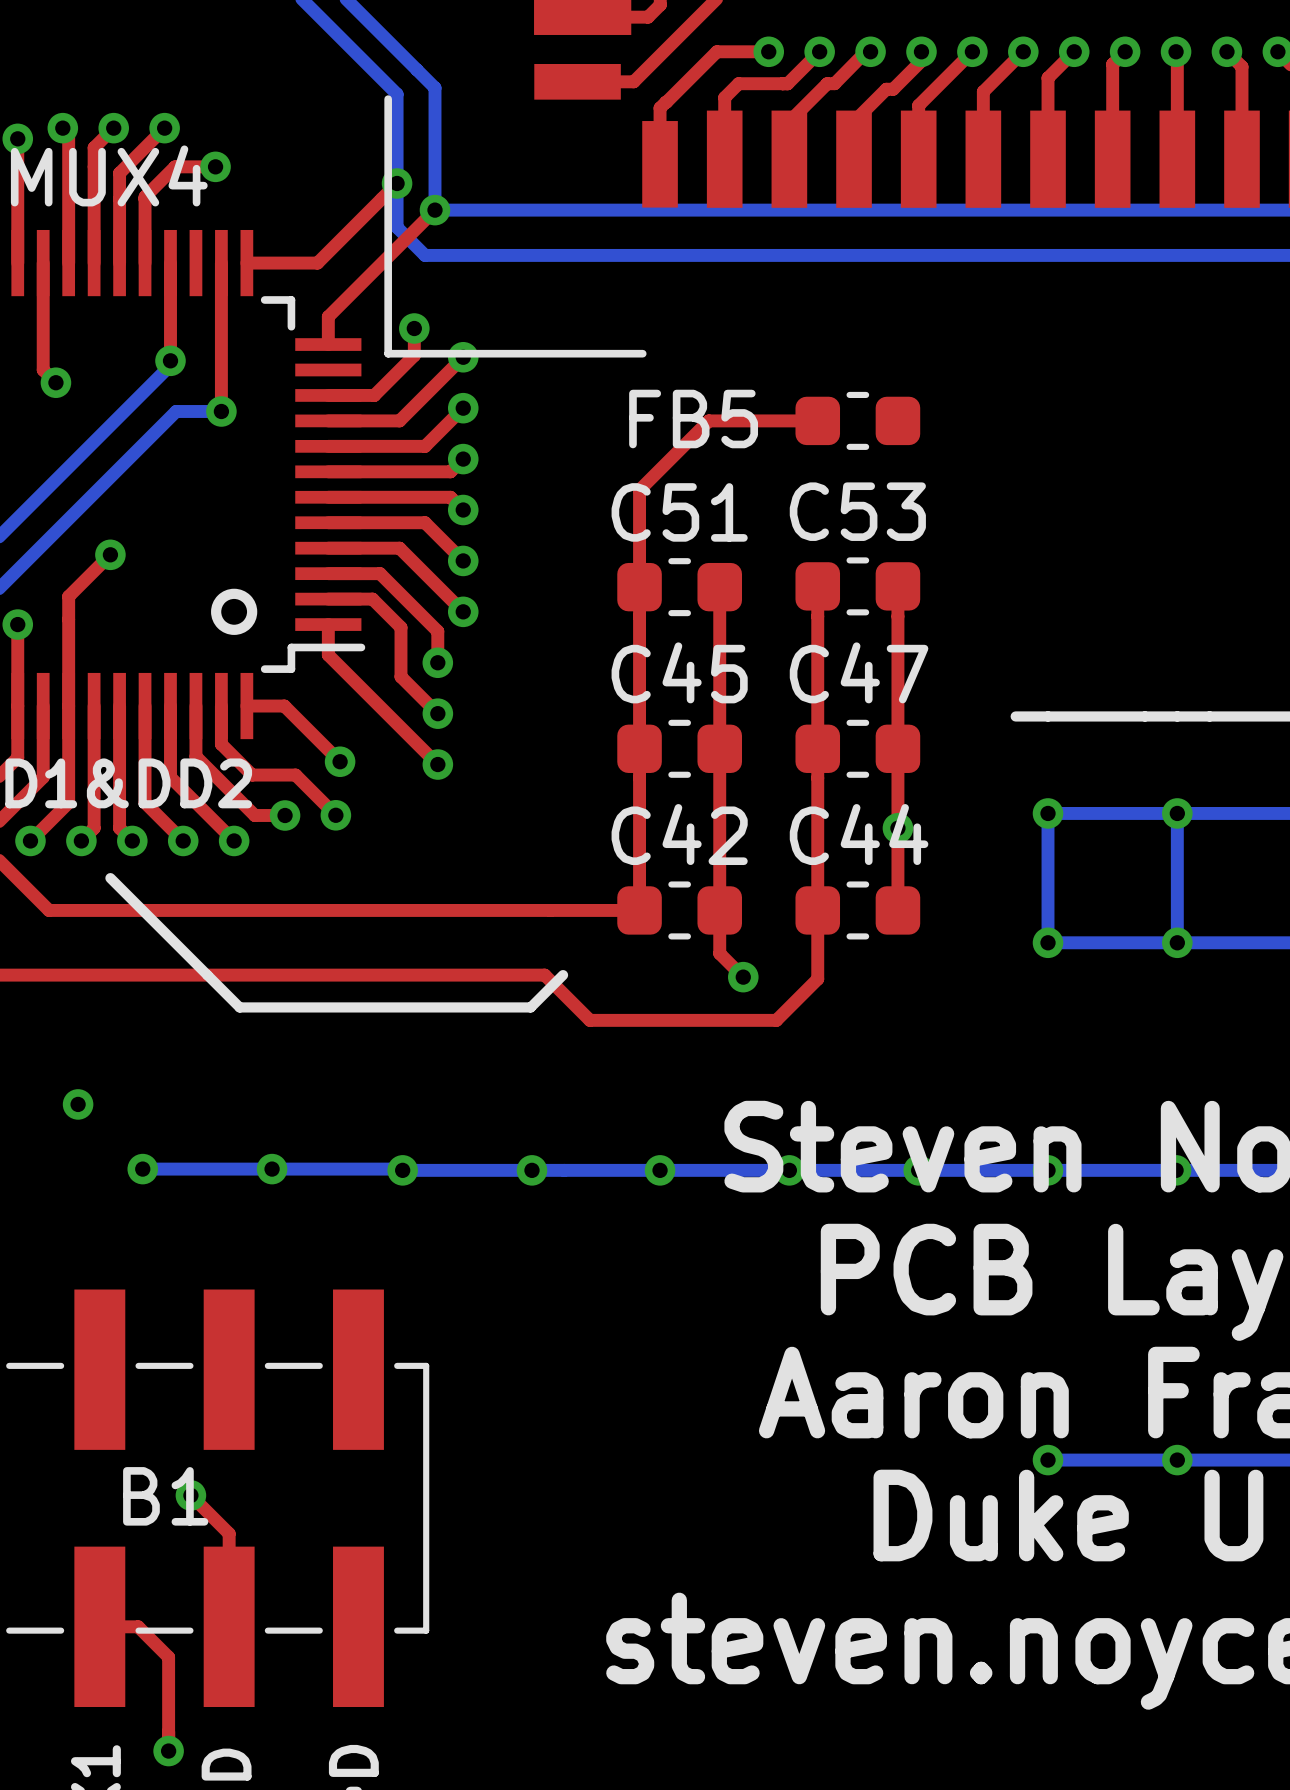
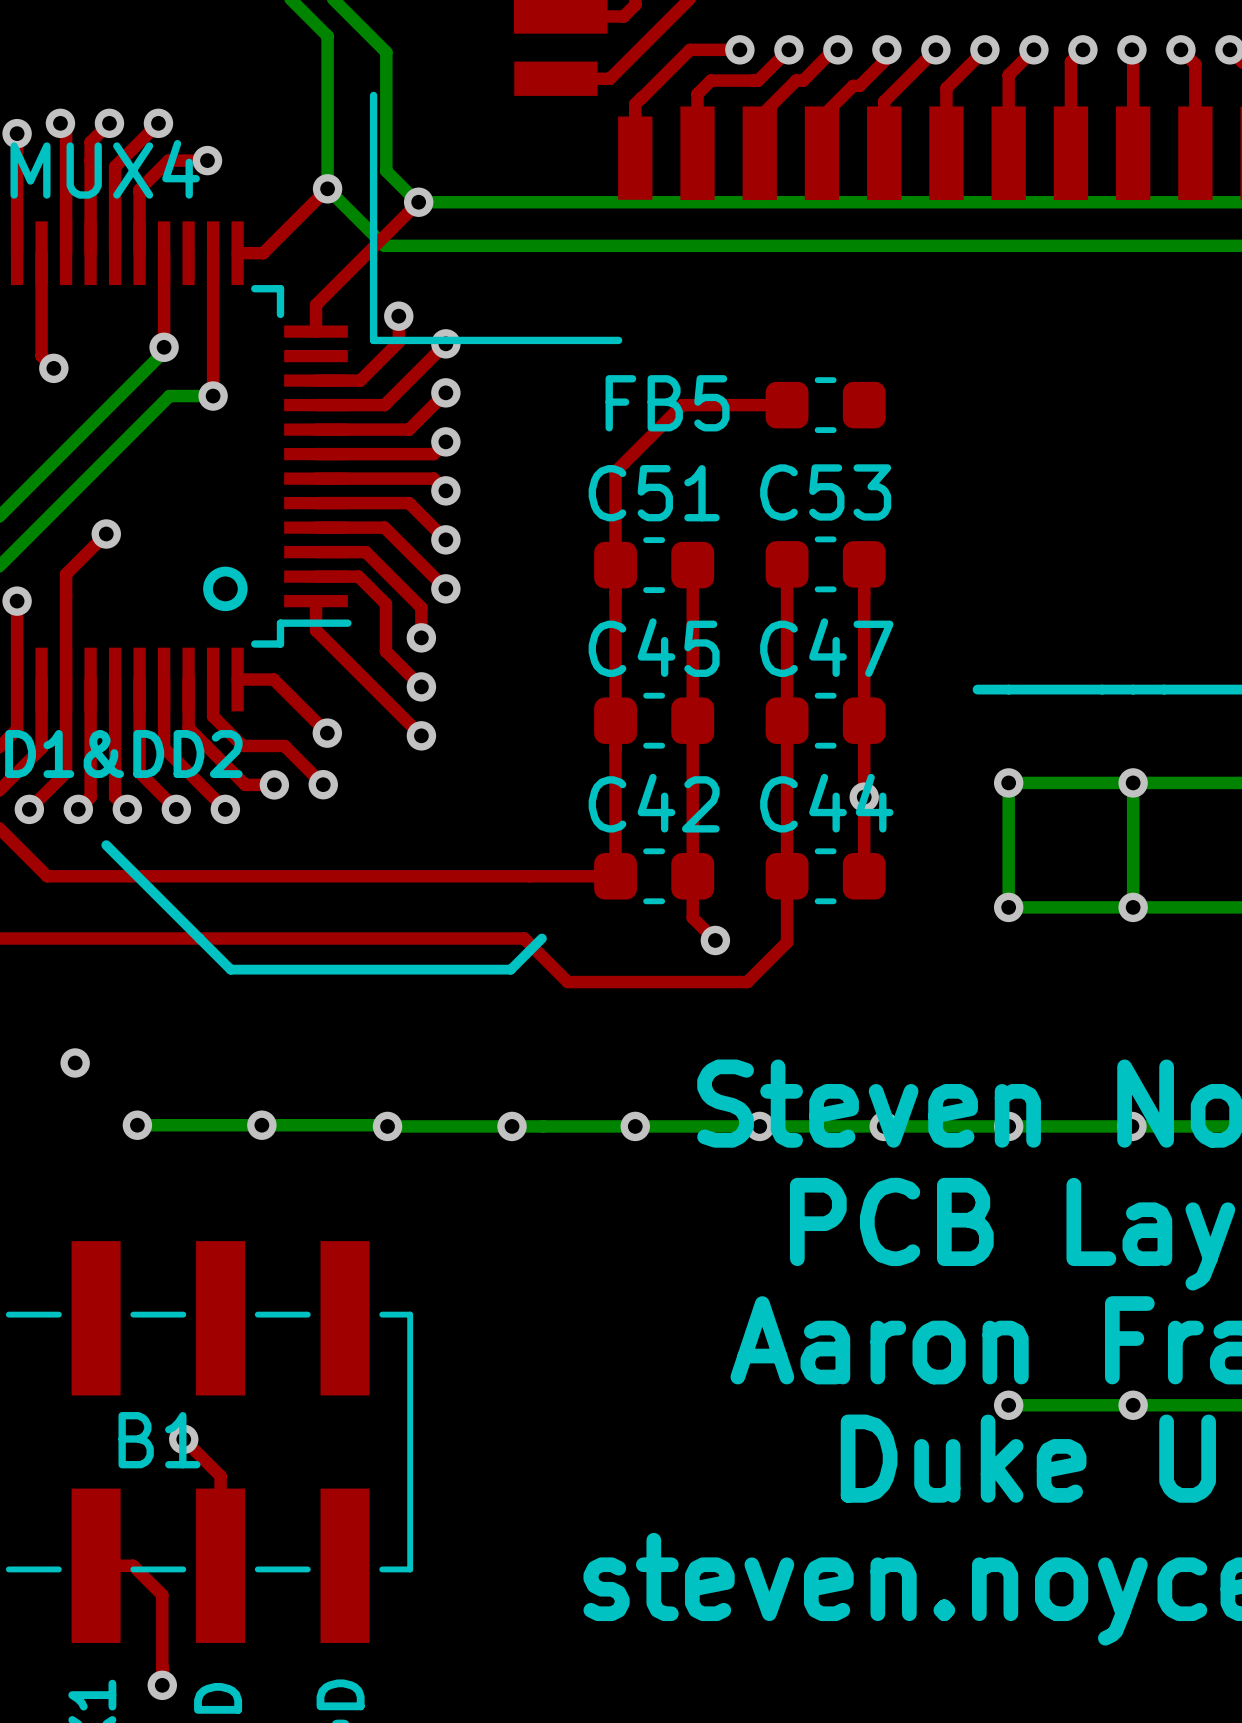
bottom track: (340, 37) (397, 94) (397, 227) (425, 255) -> (327, 36) (327, 188) (384, 245) (409, 245)
bottom track: (401, 54) (435, 87) (435, 210) -> (386, 52) (386, 171) (418, 202)
top track: (397, 183) (317, 263) (273, 263) -> (327, 188) (263, 253)
via position: (397, 183) -> (327, 188)

